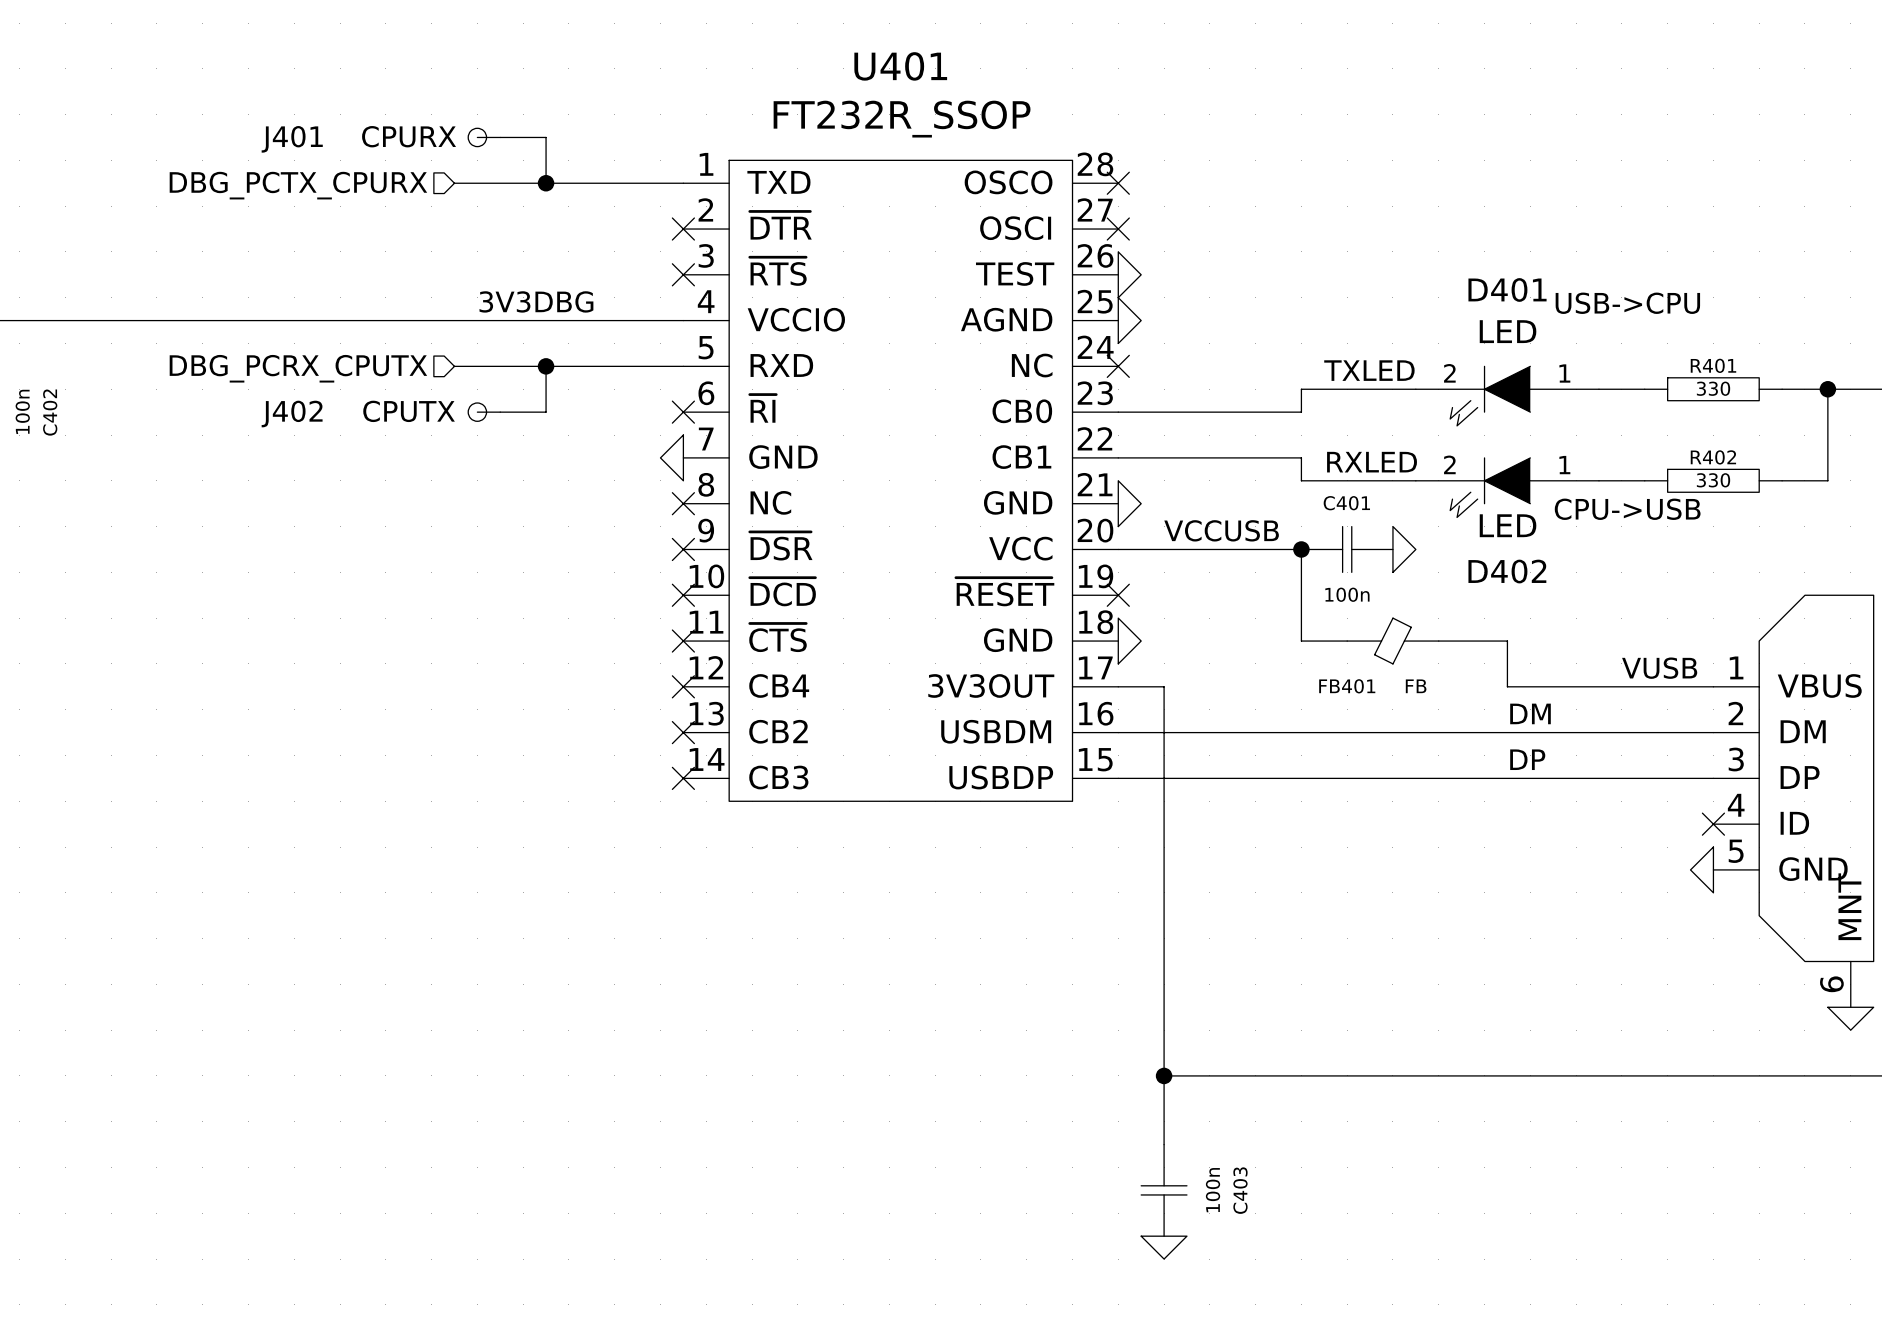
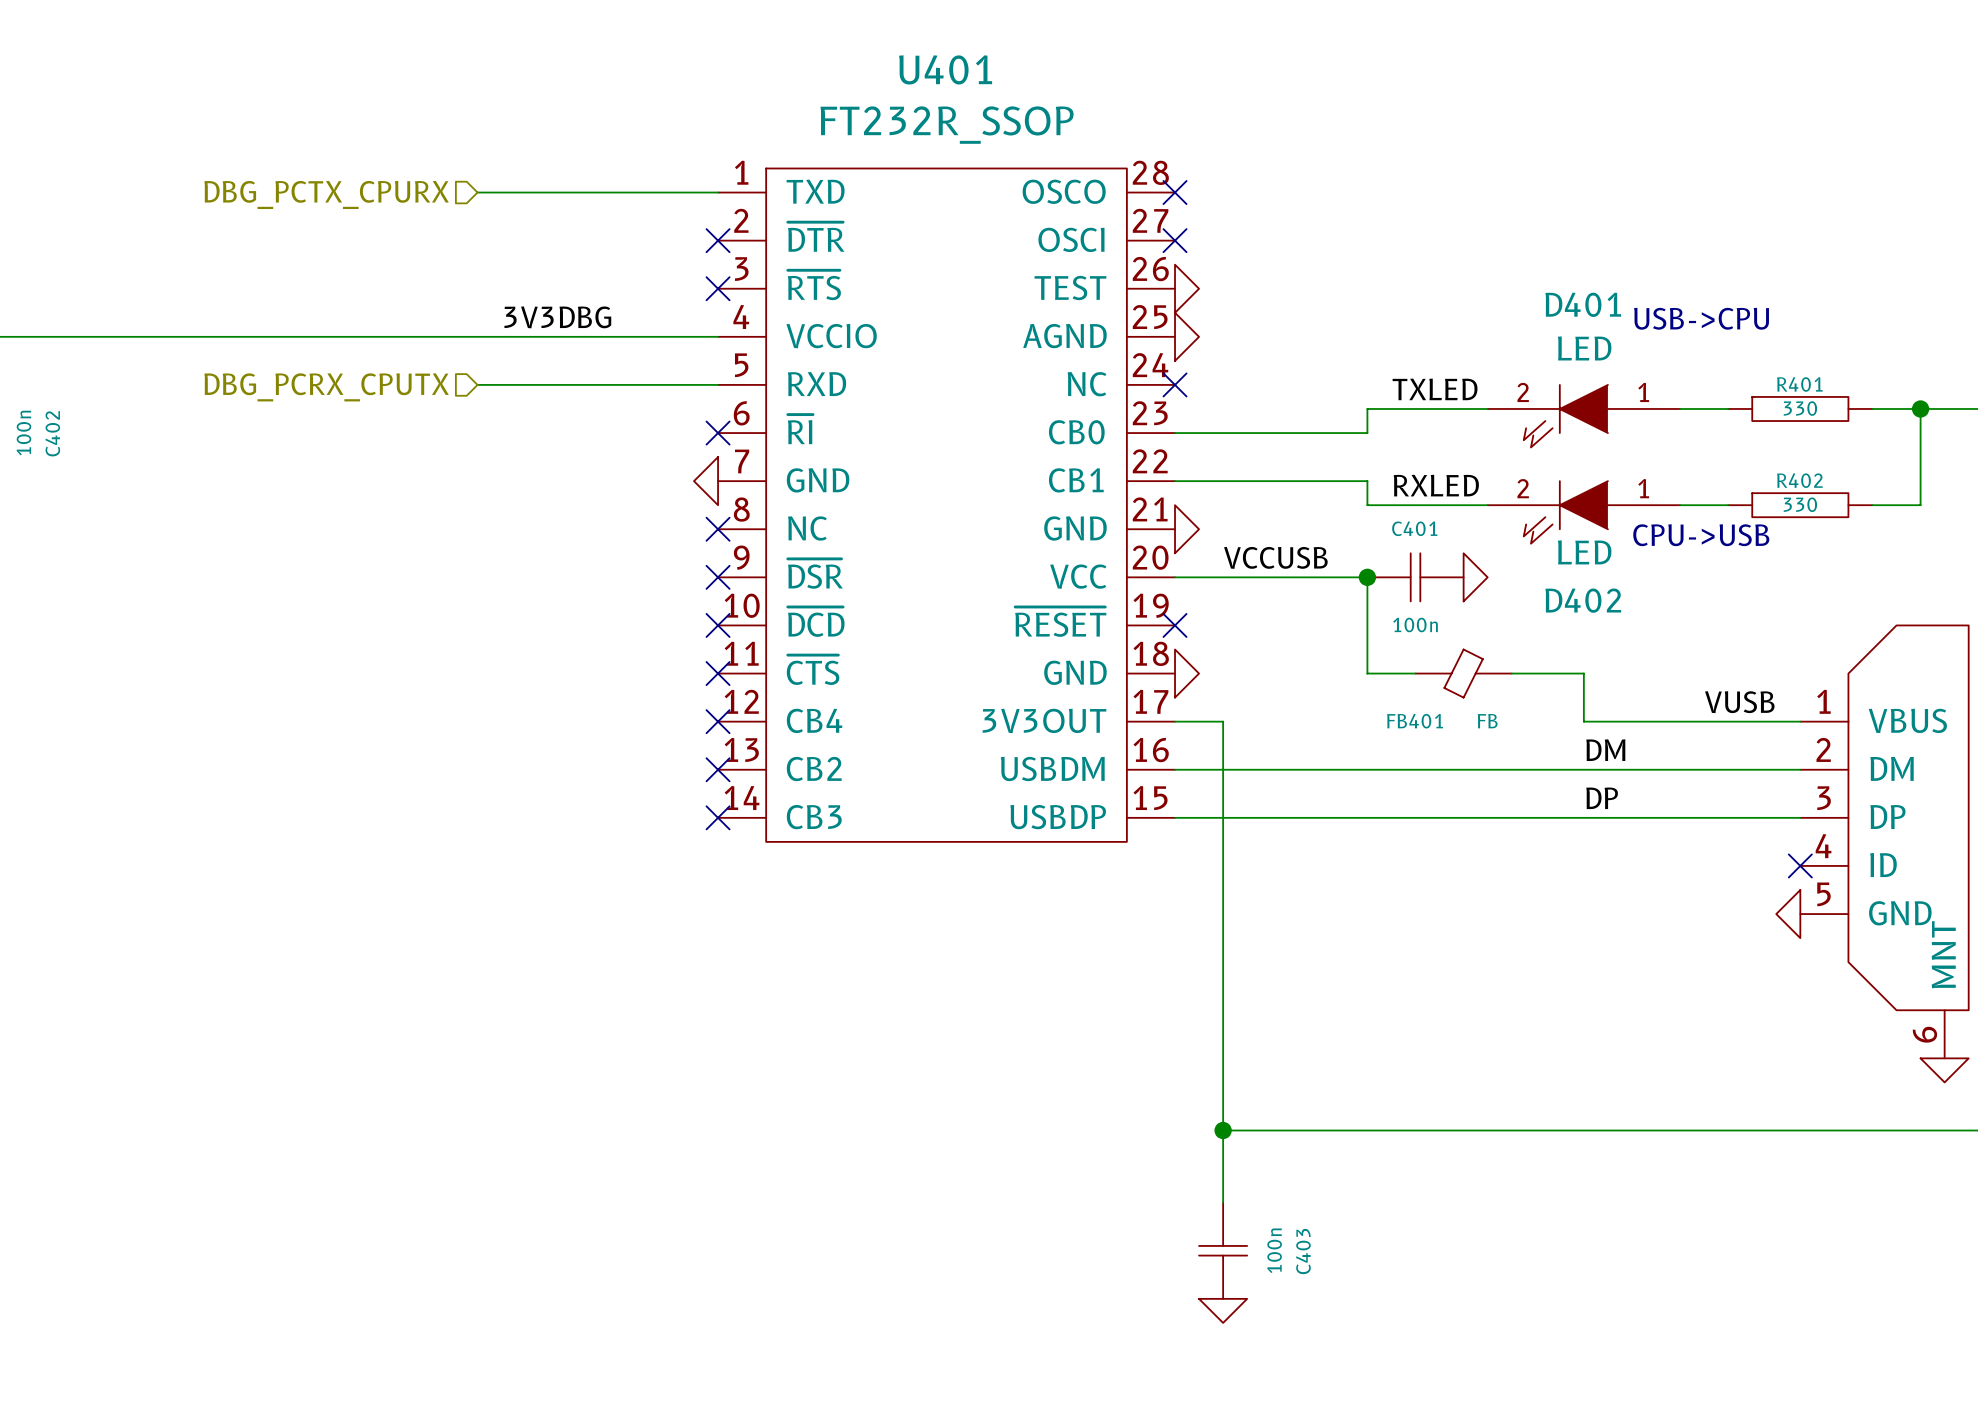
J401: CPURX (484, 137) -> none
wire: (500, 137) (546, 137) (546, 183) -> none
junction: (546, 183) -> none
wire: (546, 366) (546, 412) (500, 412) -> none
junction: (546, 366) -> none
J402: CPUTX (484, 412) -> none

